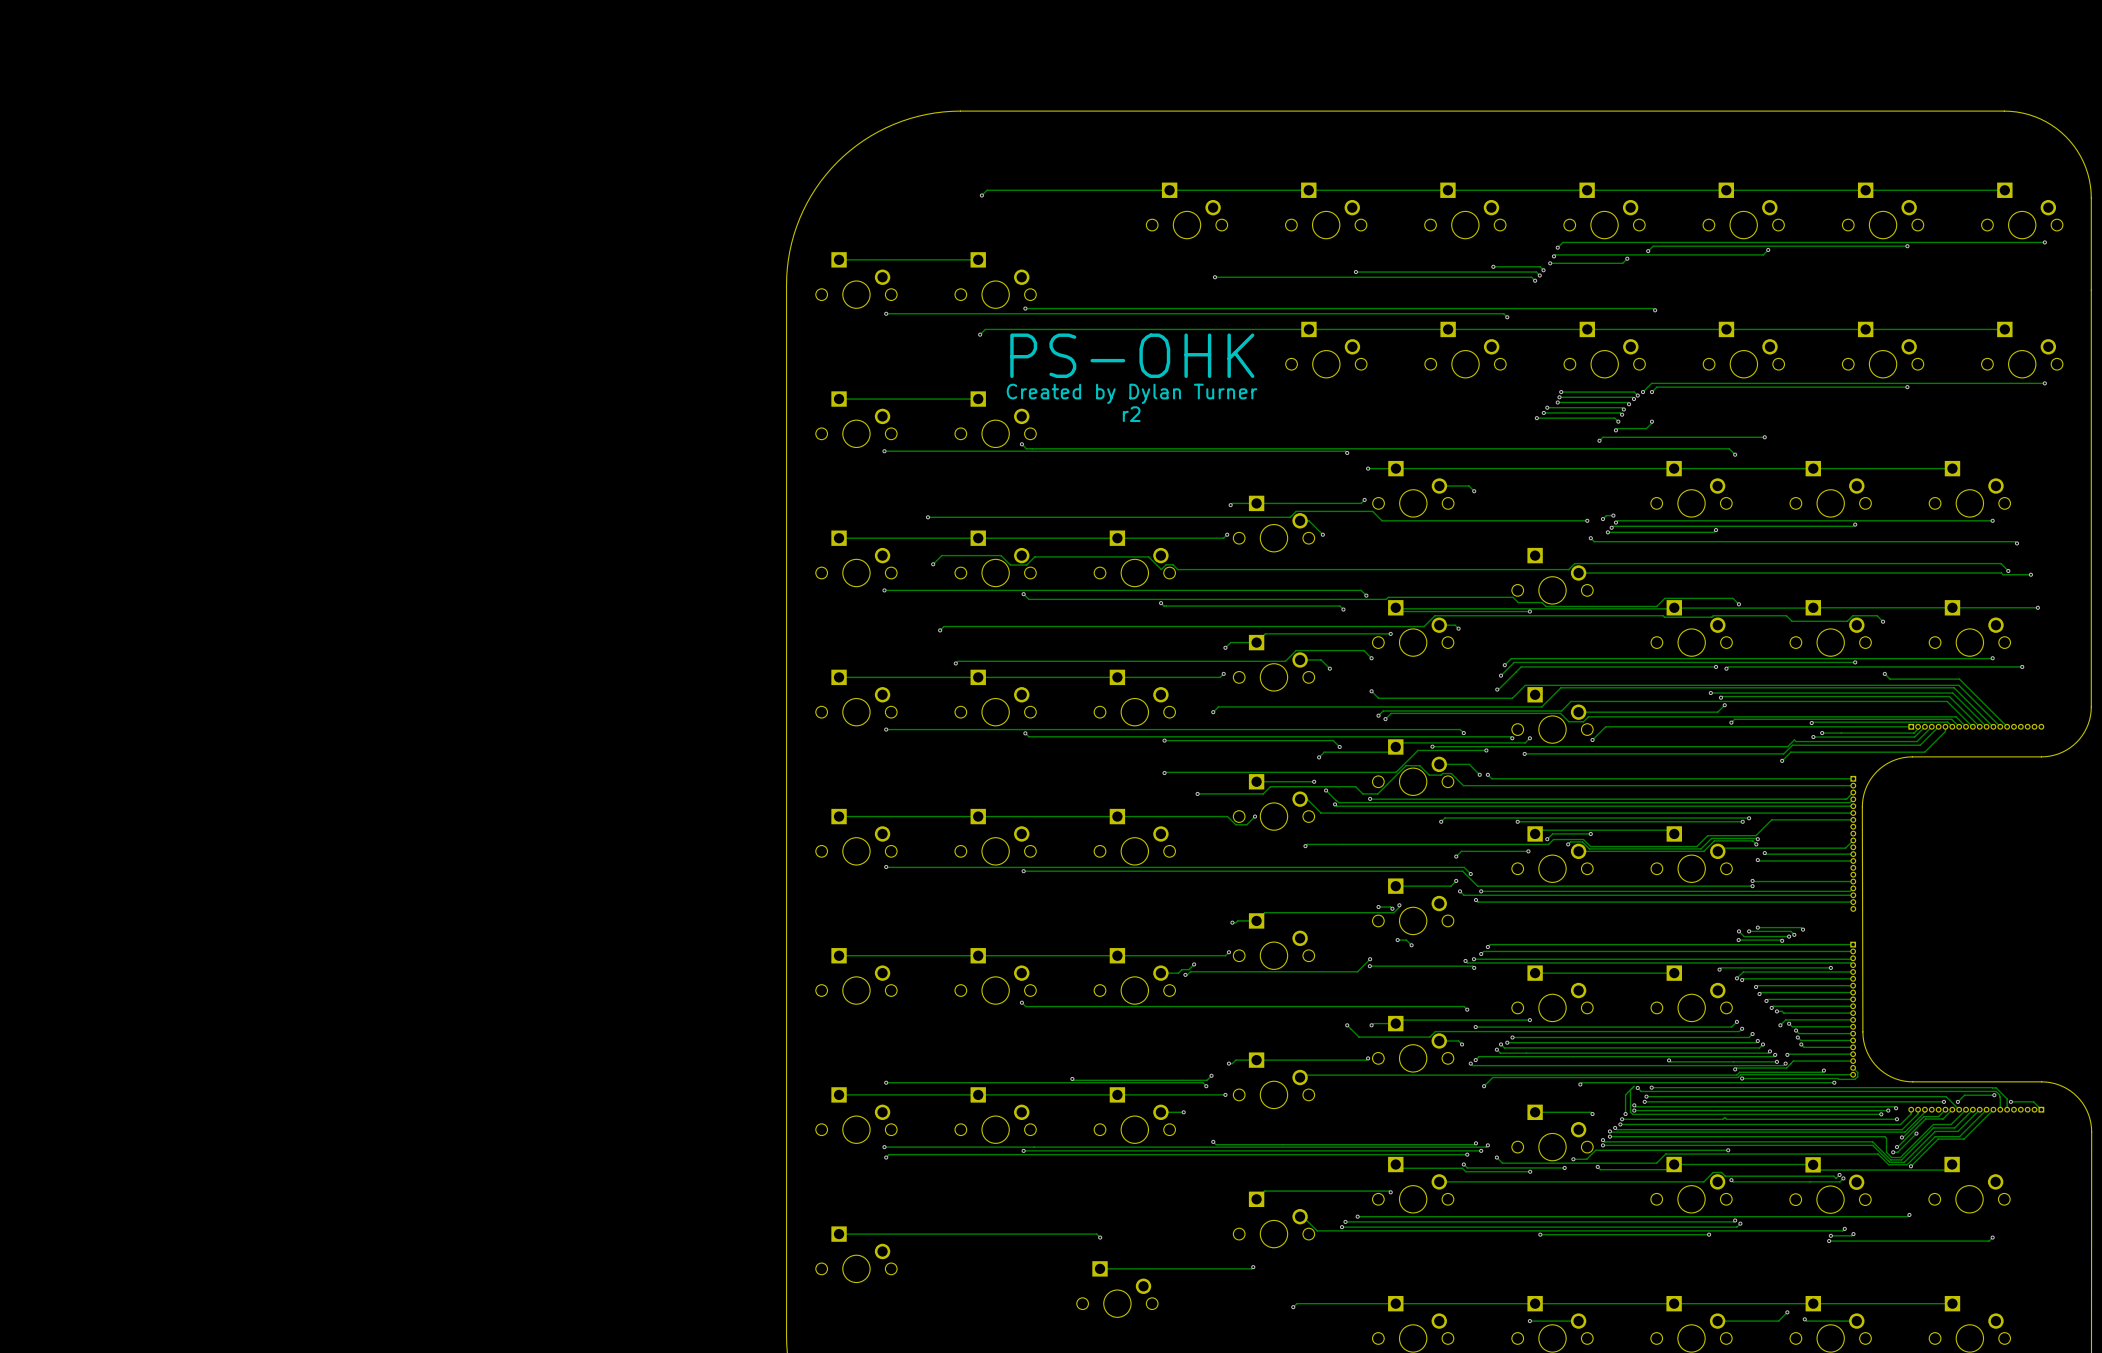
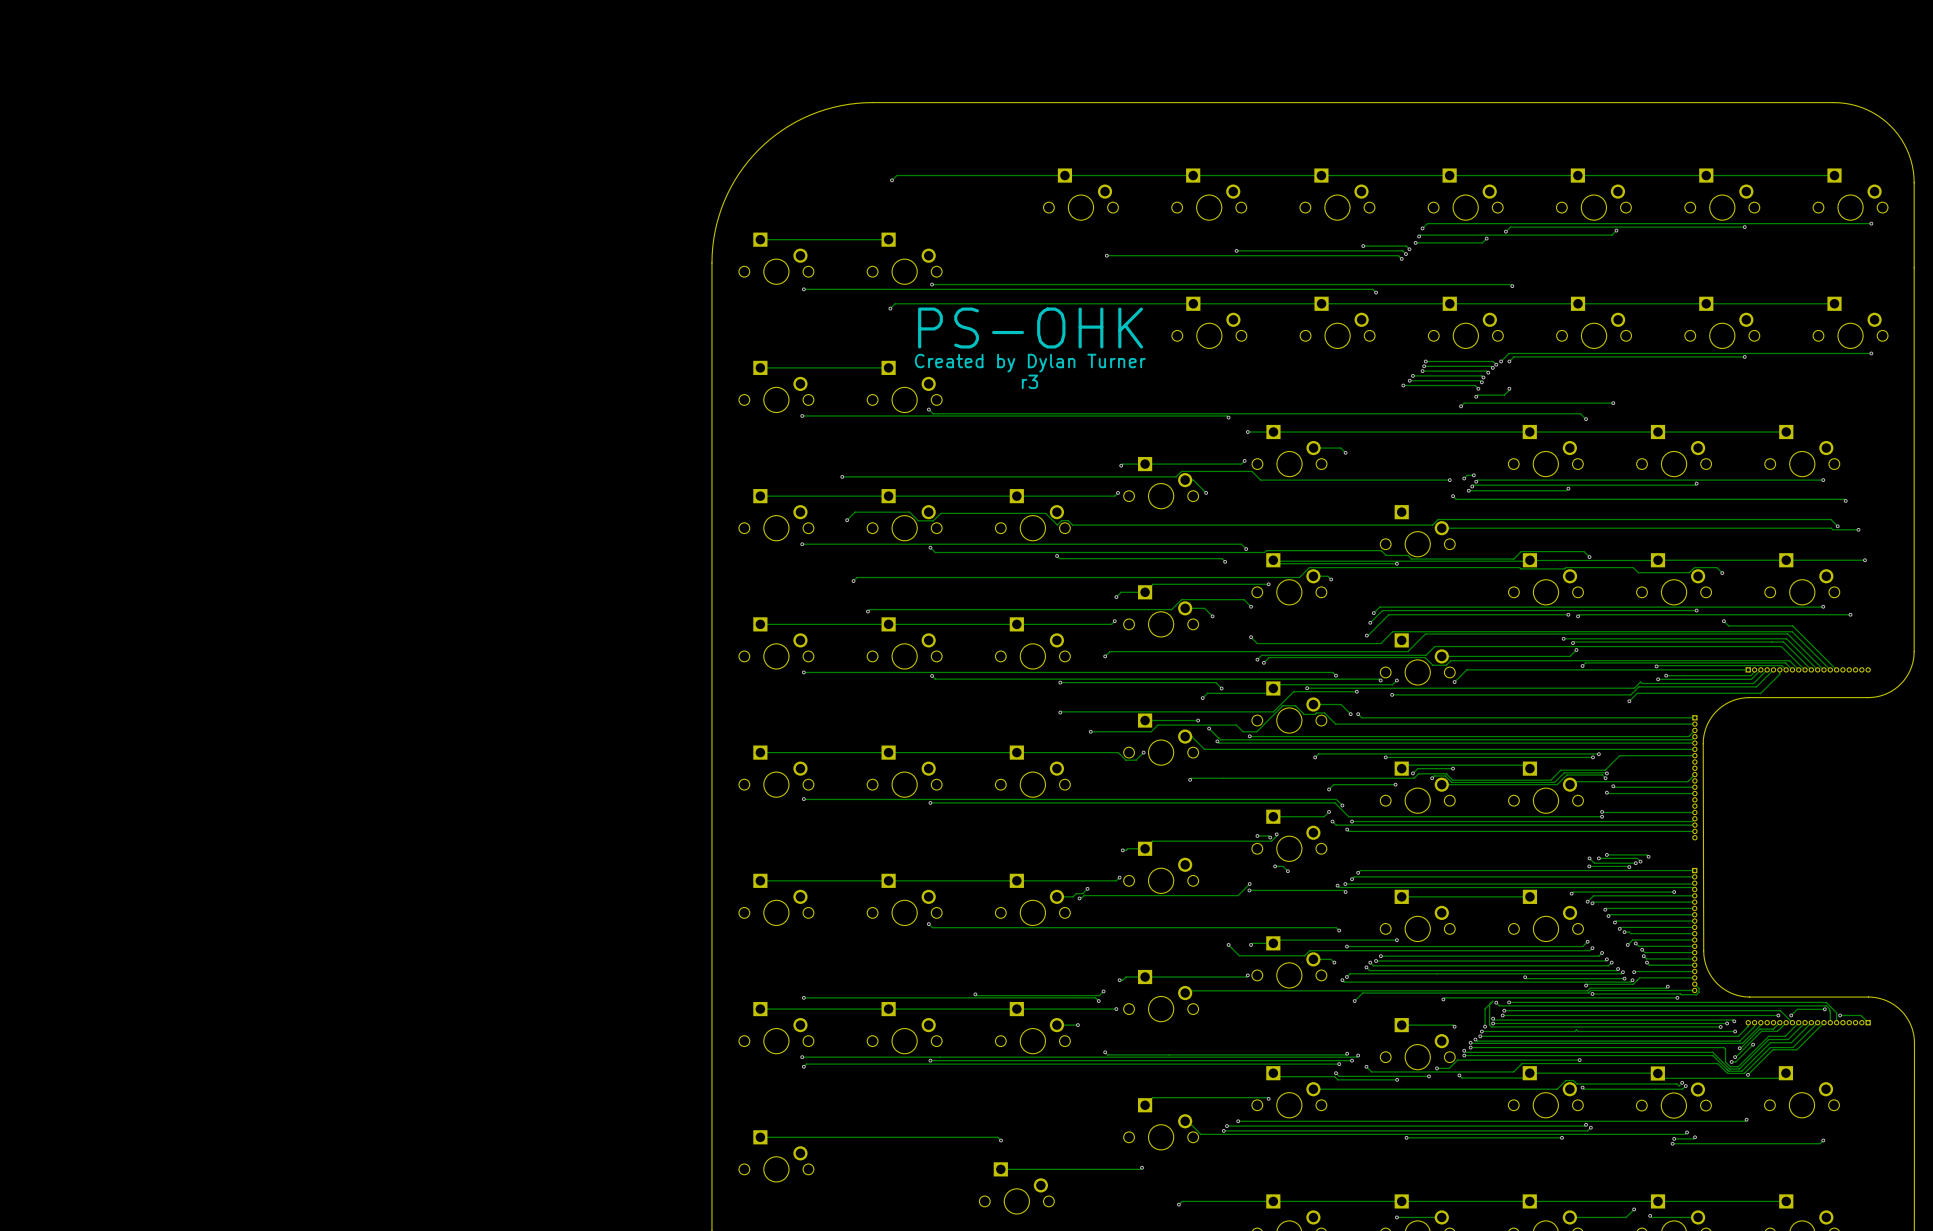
text: r2 (1131, 414) -> r3 (1029, 381)

